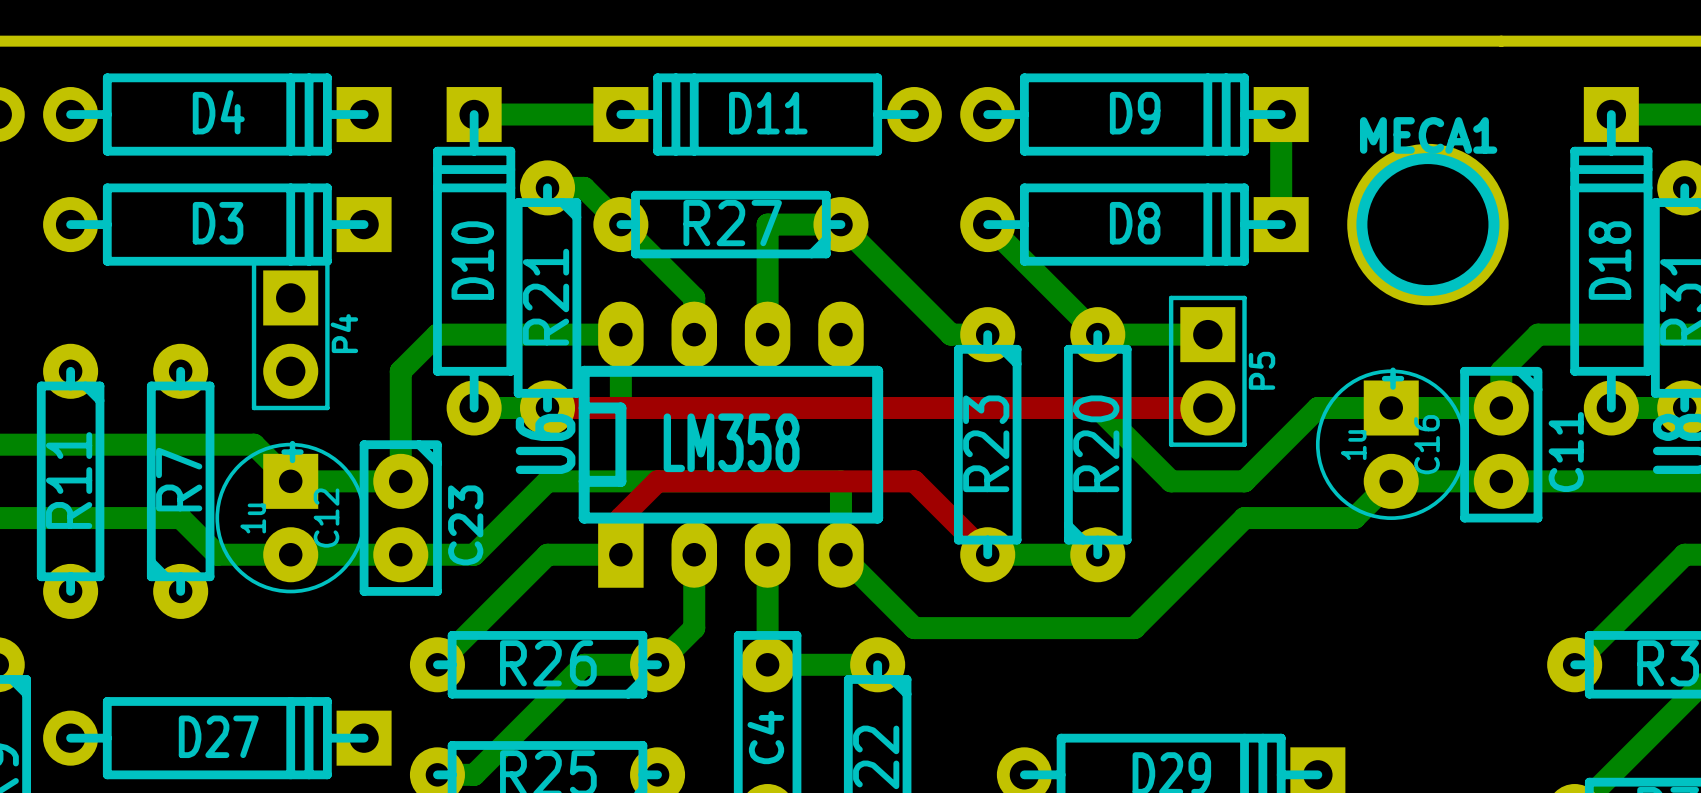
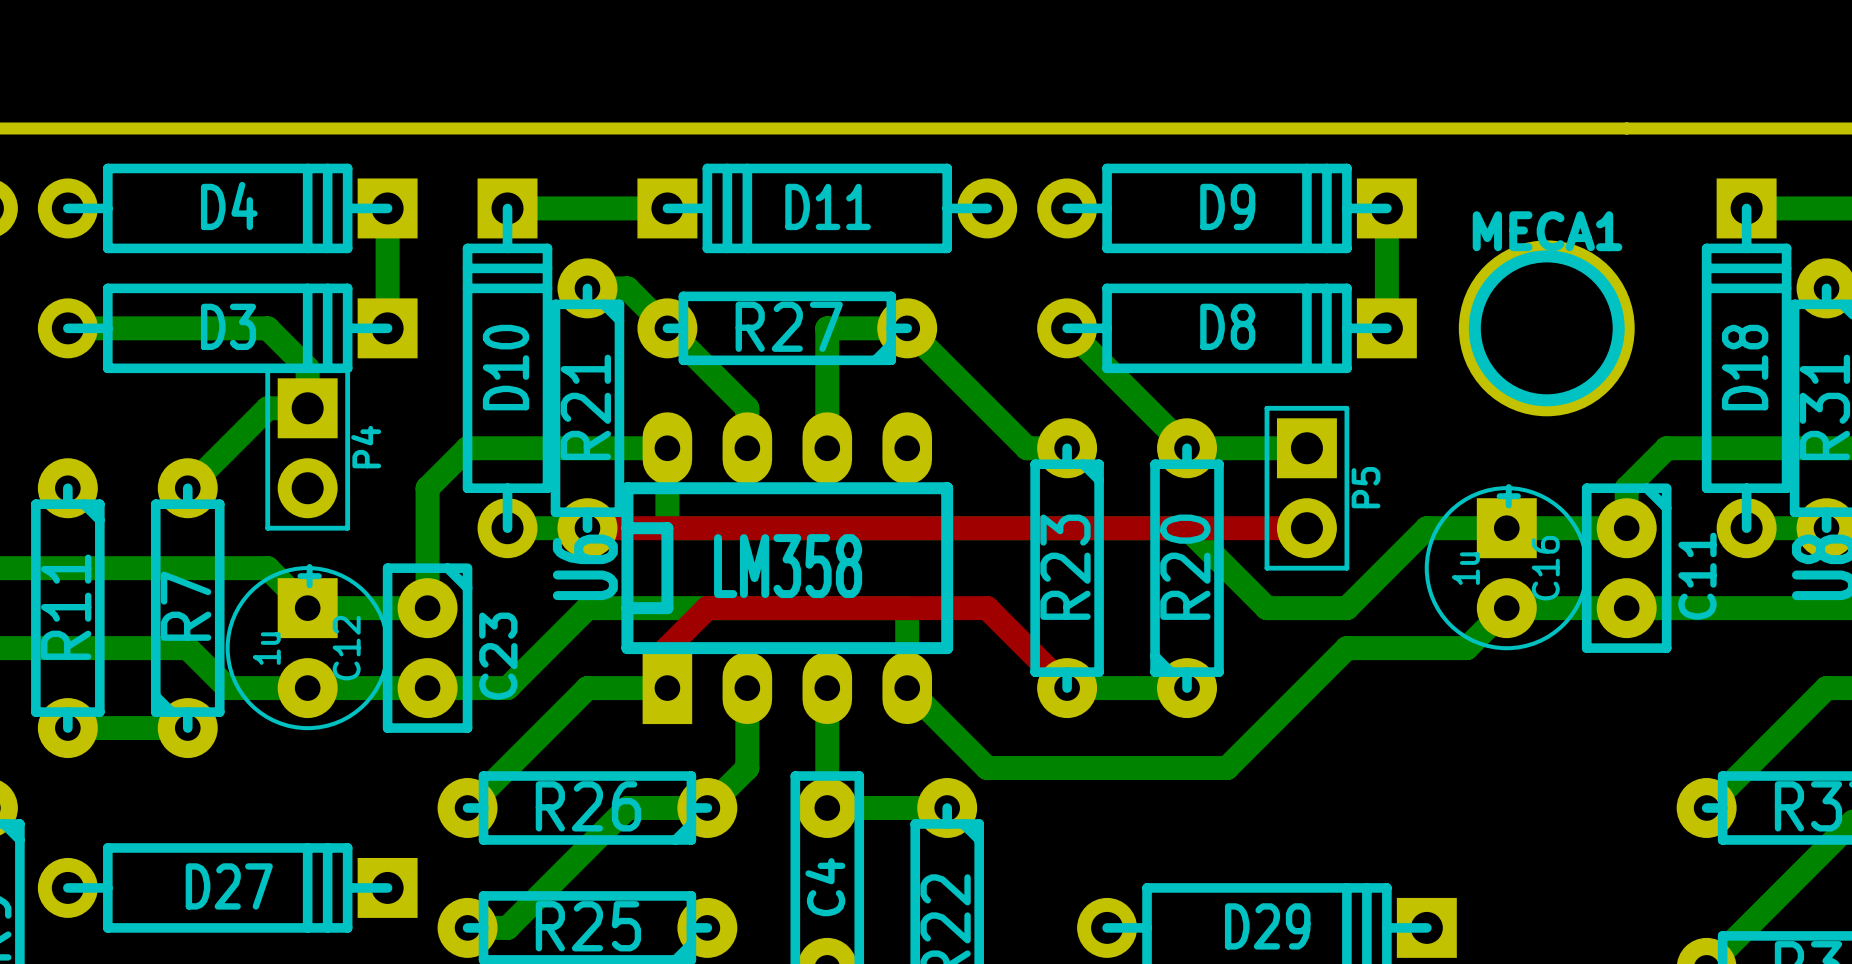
bottom track: none -> (387, 208) (387, 328)
bottom track: none -> (67, 328) (267, 328) (307, 368) (307, 408) (267, 408) (187, 488)
bottom track: none -> (67, 728) (187, 728)

